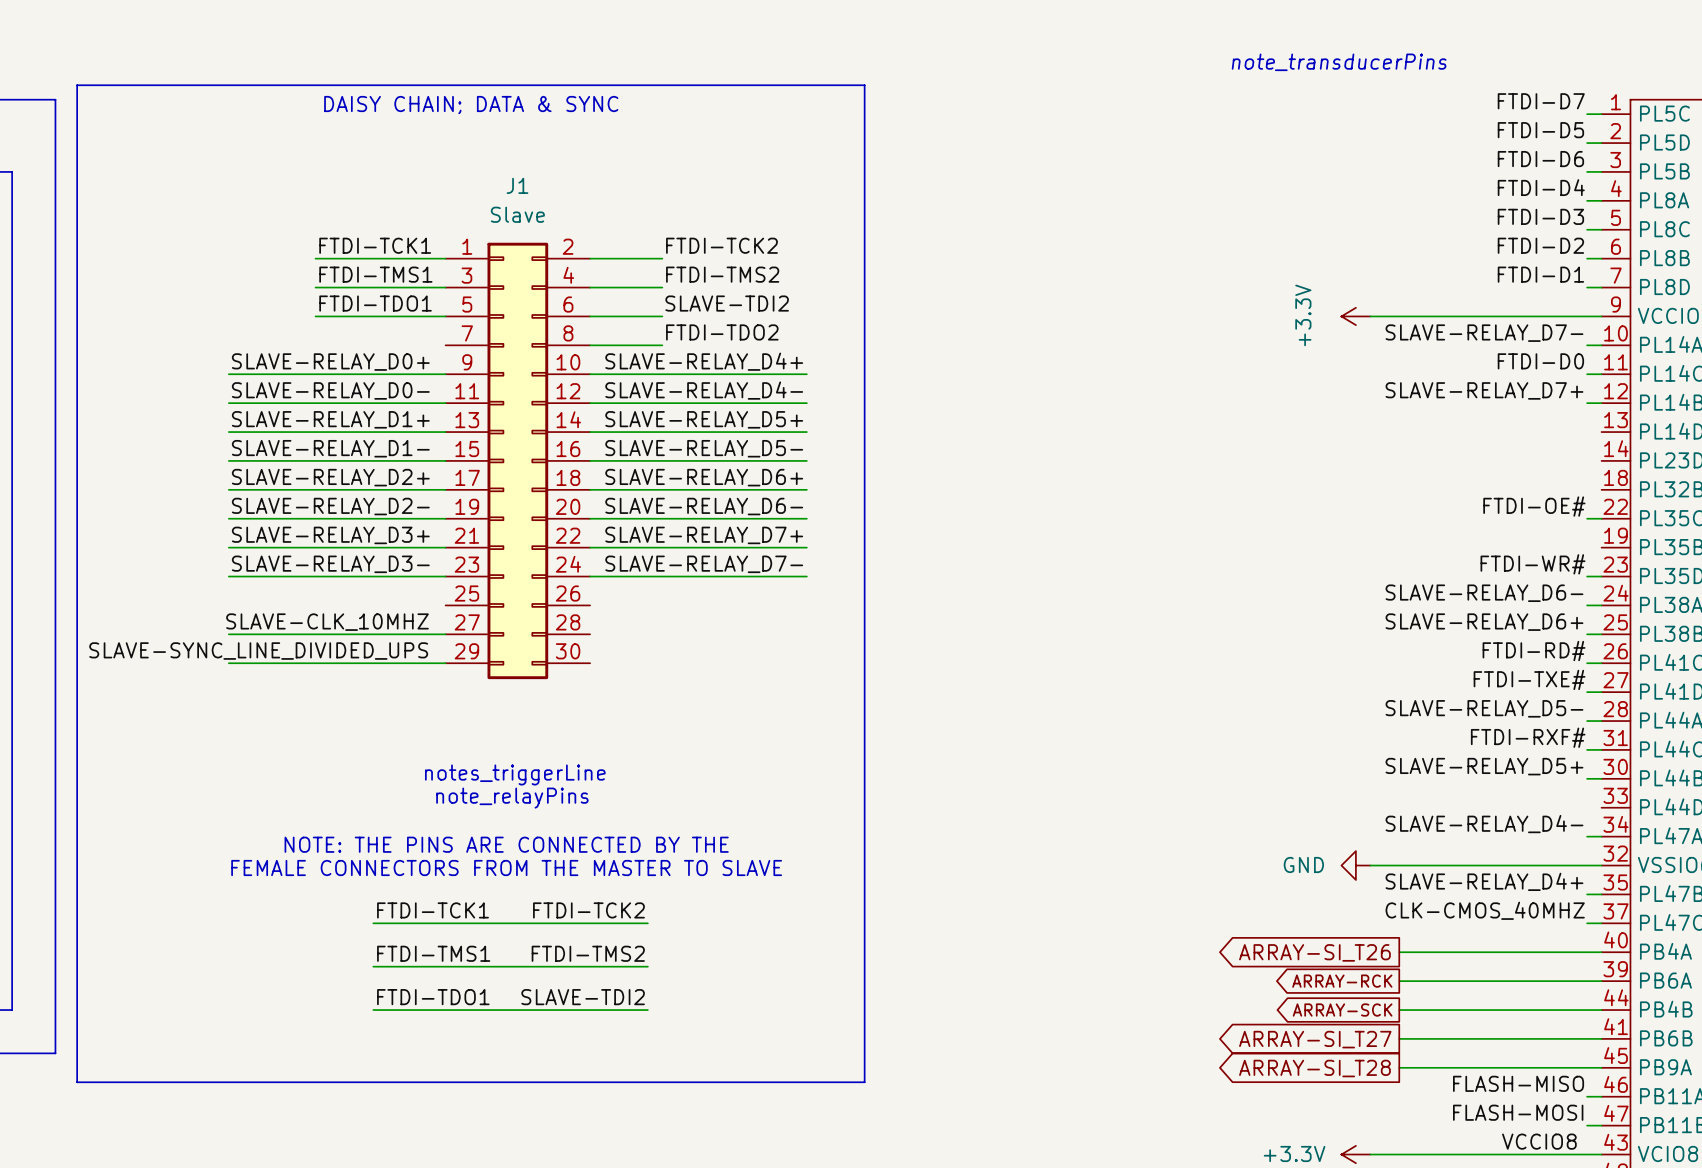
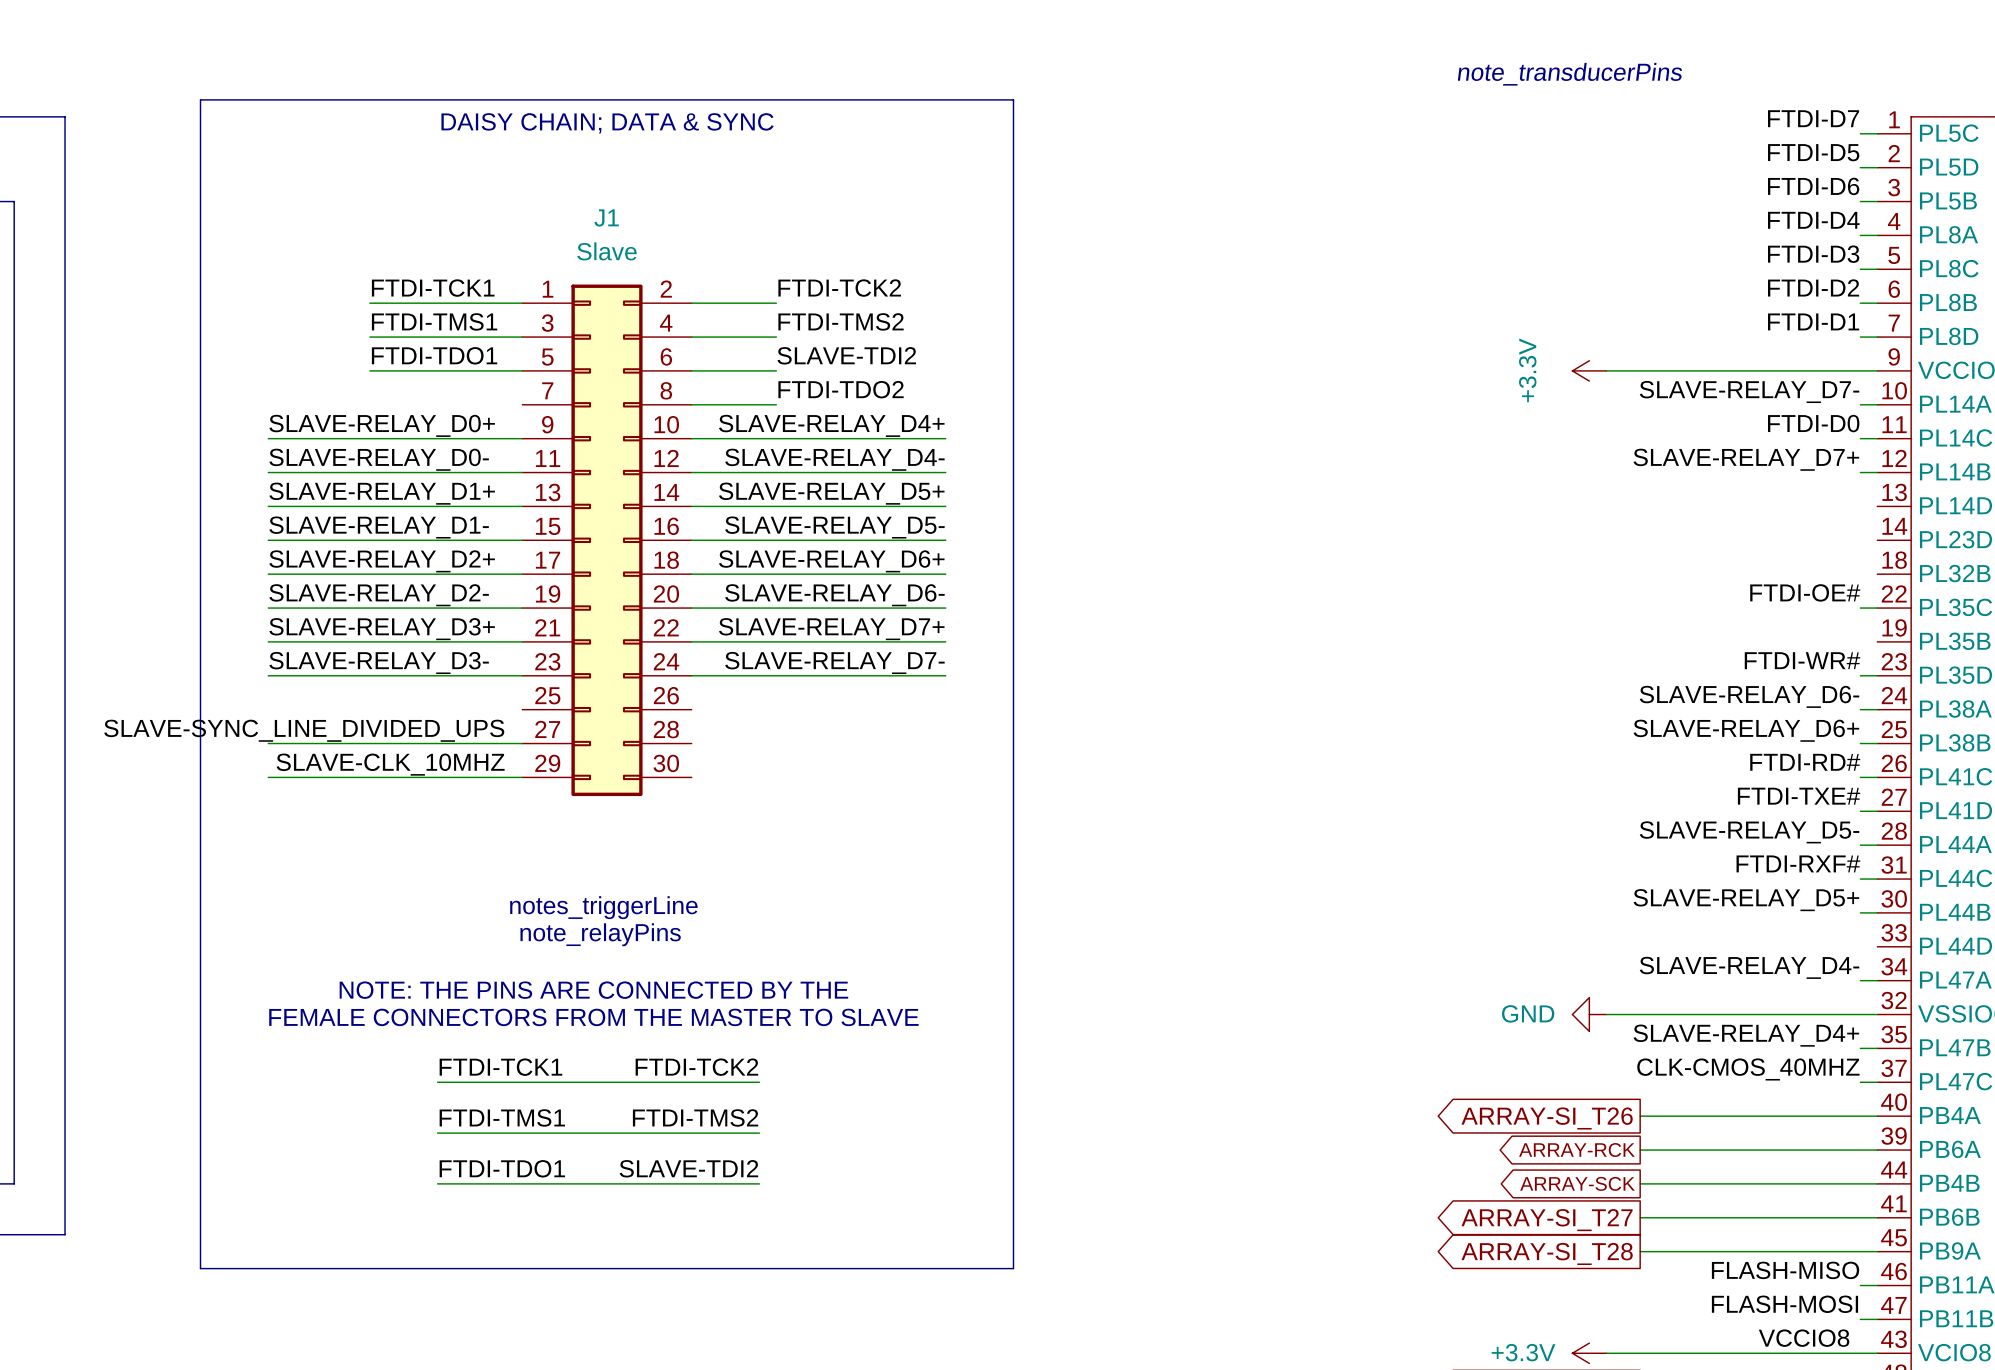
line: (171, 85) (77, 85) (77, 1082) (171, 1082) -> (200, 99) (200, 1268)
text position: DAISY CHAIN; DATA & SYNC (471, 105) -> DAISY CHAIN; DATA & SYNC (607, 123)
label: SLAVE-CLK_10MHZ (327, 622) -> SLAVE-SYNC_LINE_DIVIDED_UPS (304, 730)
label: SLAVE-SYNC_LINE_DIVIDED_UPS (258, 651) -> SLAVE-CLK_10MHZ (390, 764)

